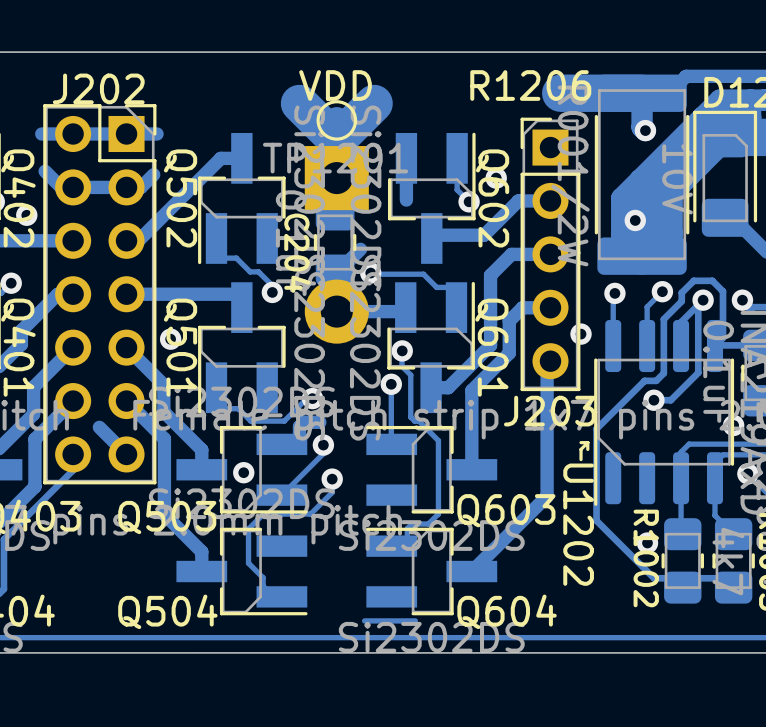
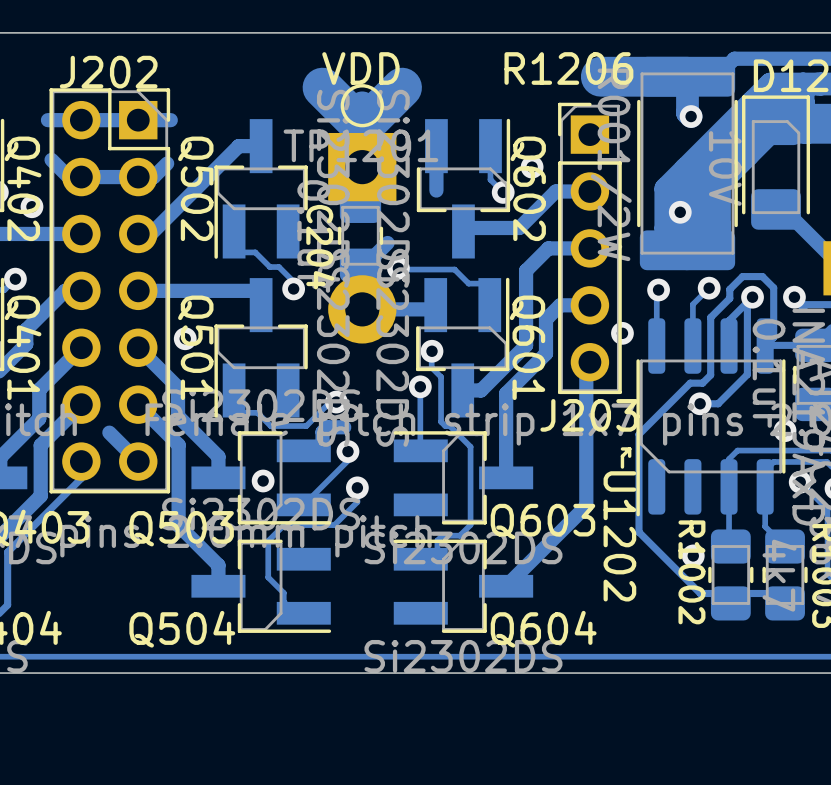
track: (415, 620) (364, 620) -> none

